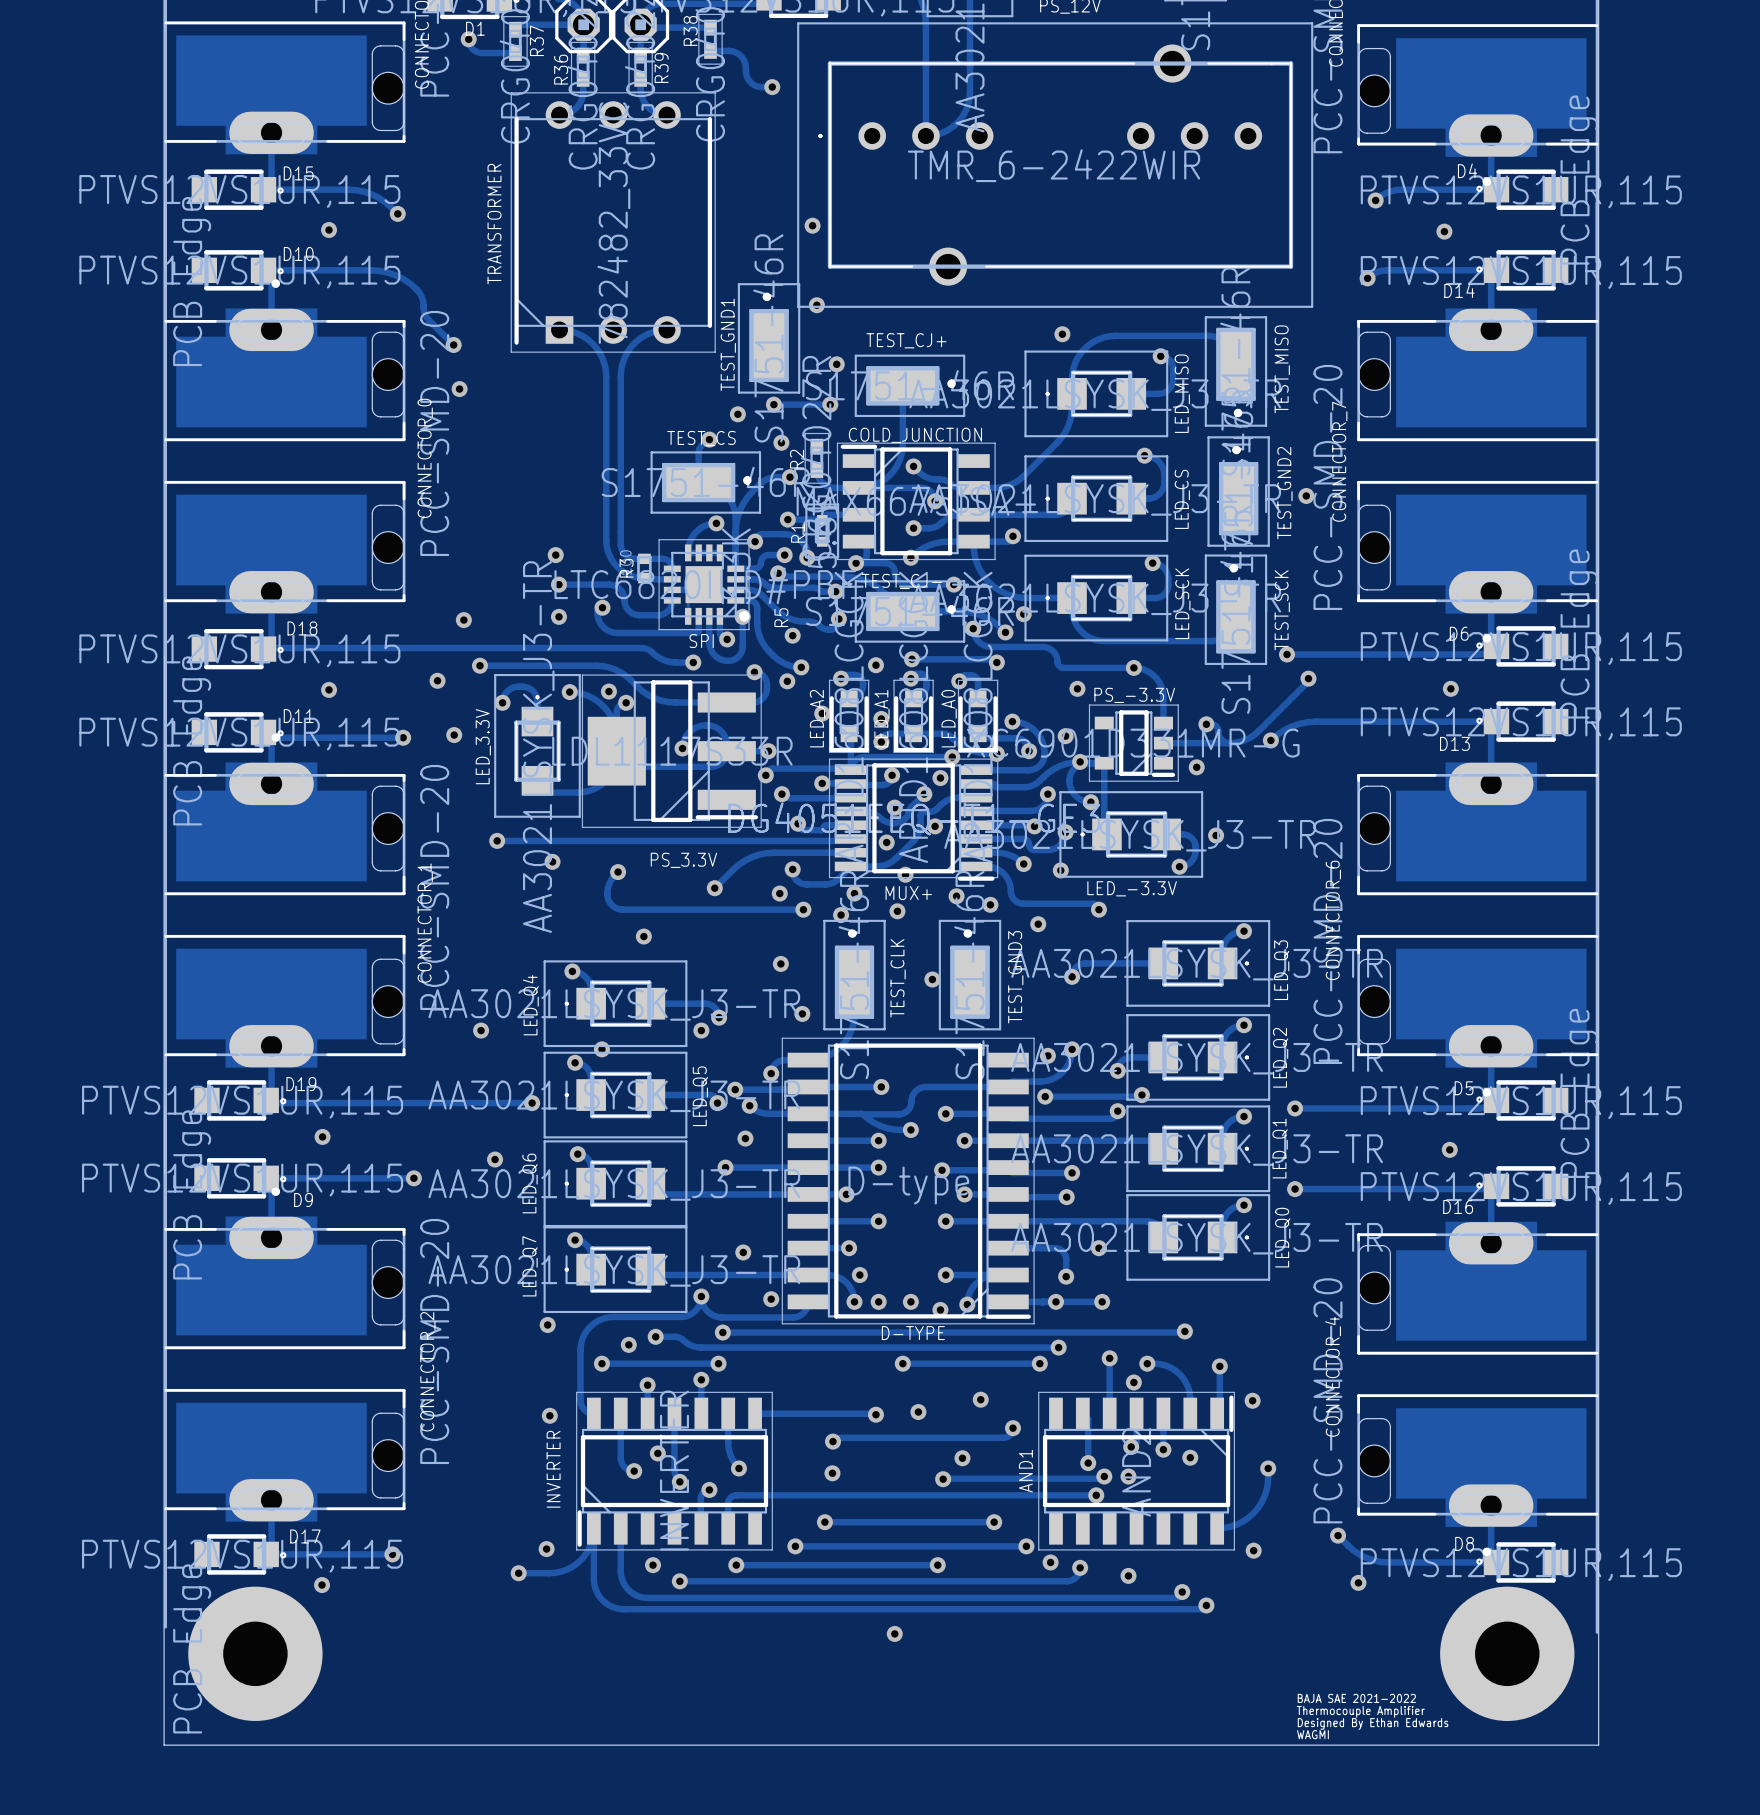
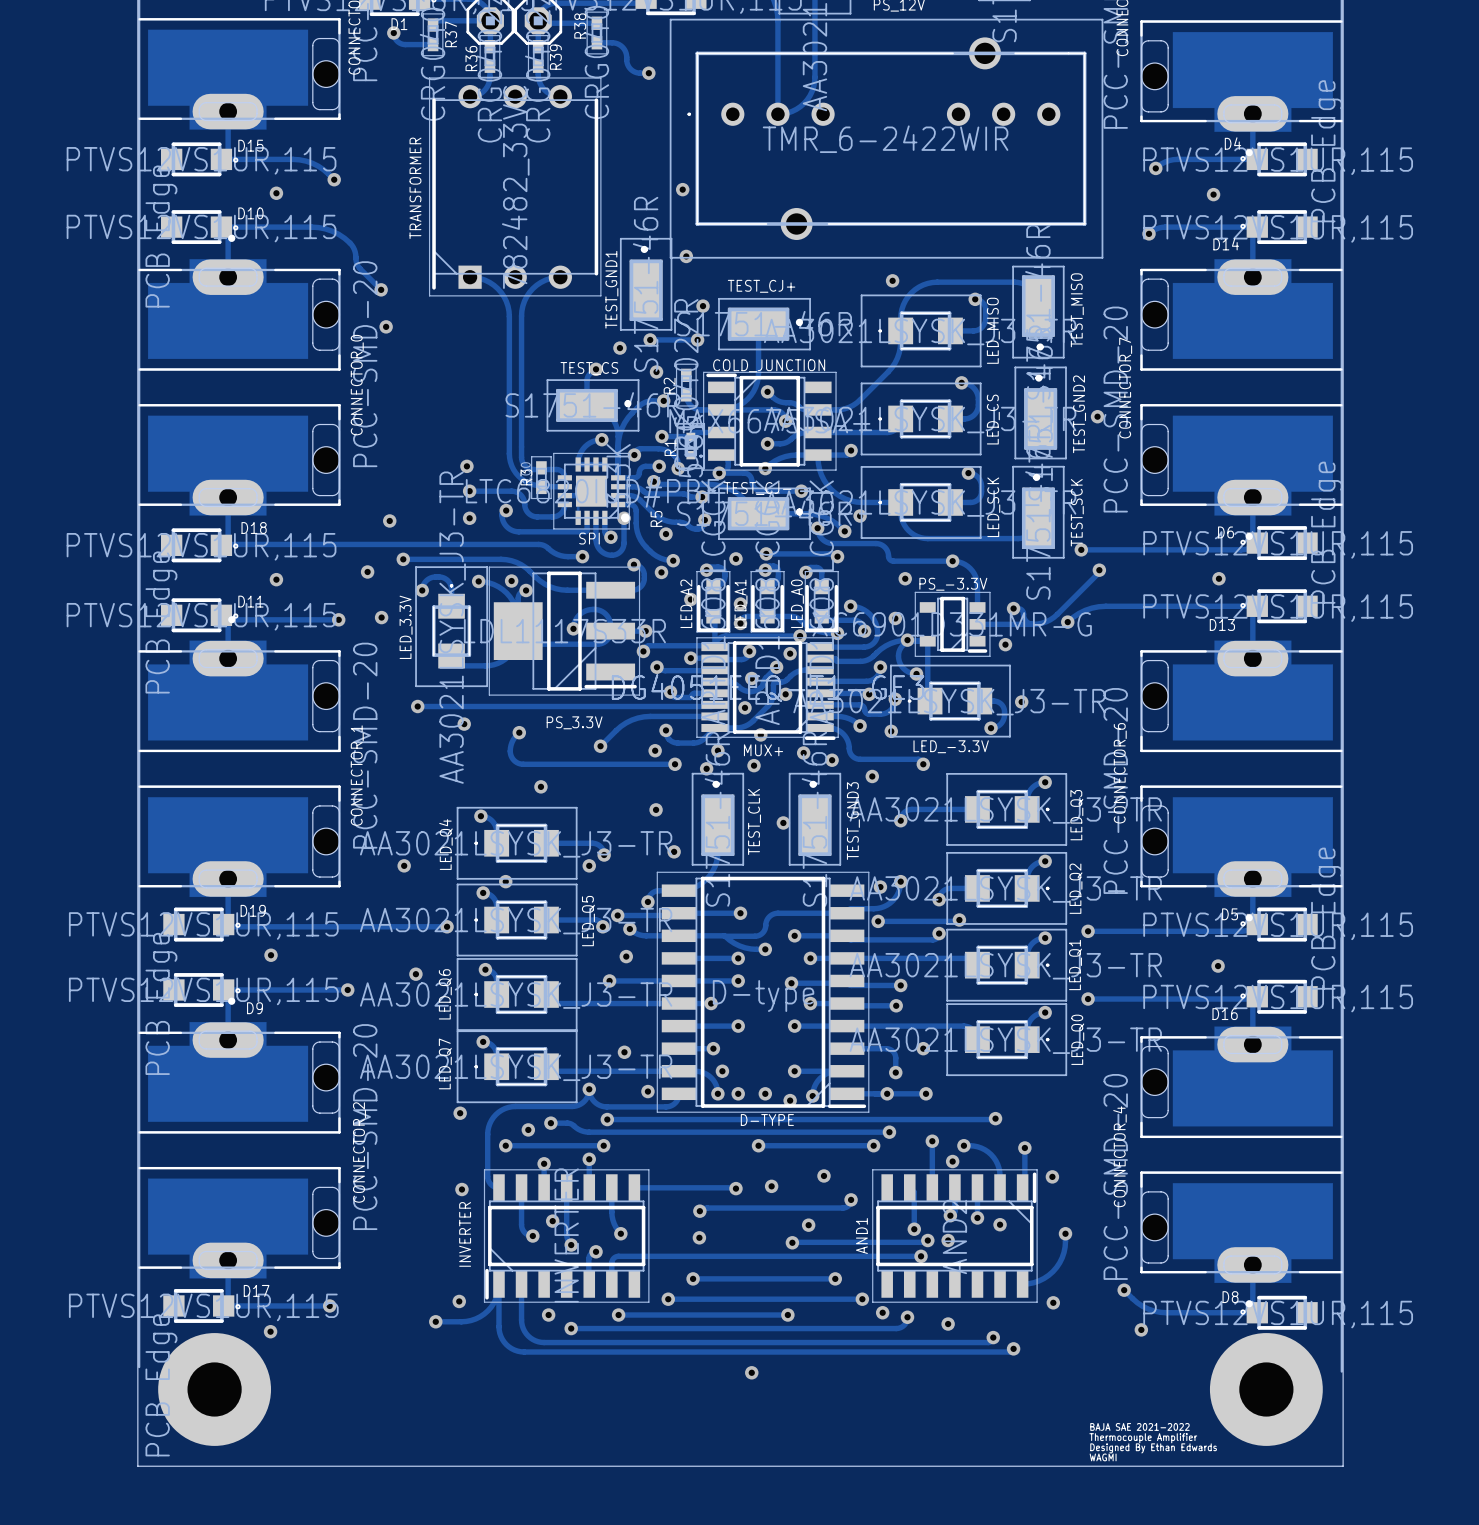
R3 footprint: [637, 553, 652, 584] -> [531, 456, 552, 499]

